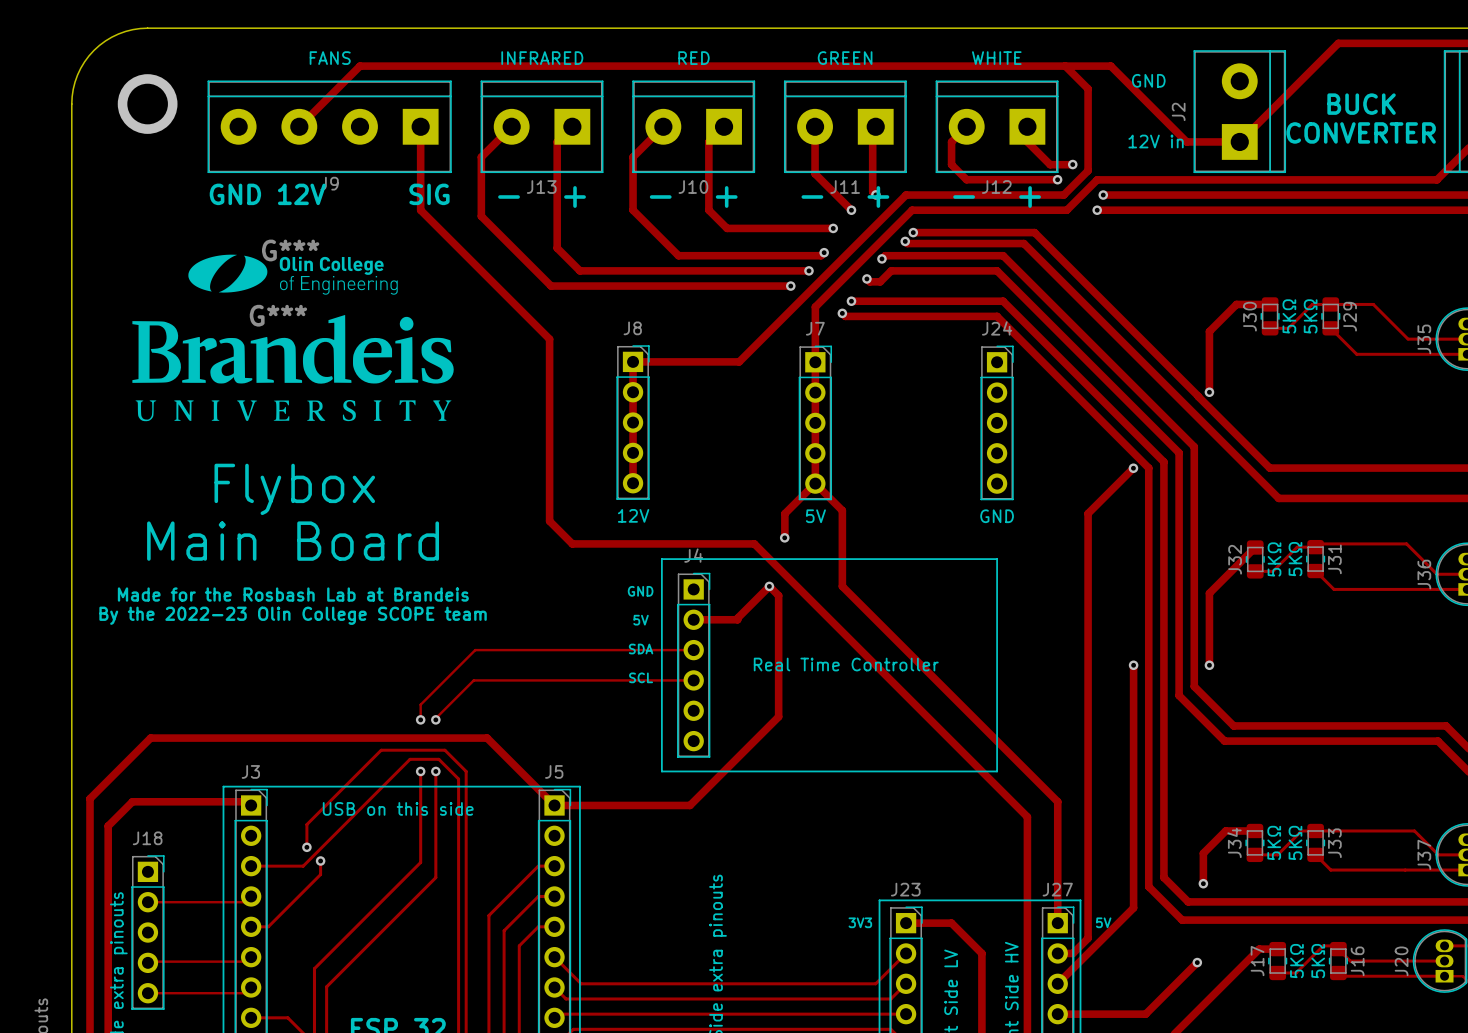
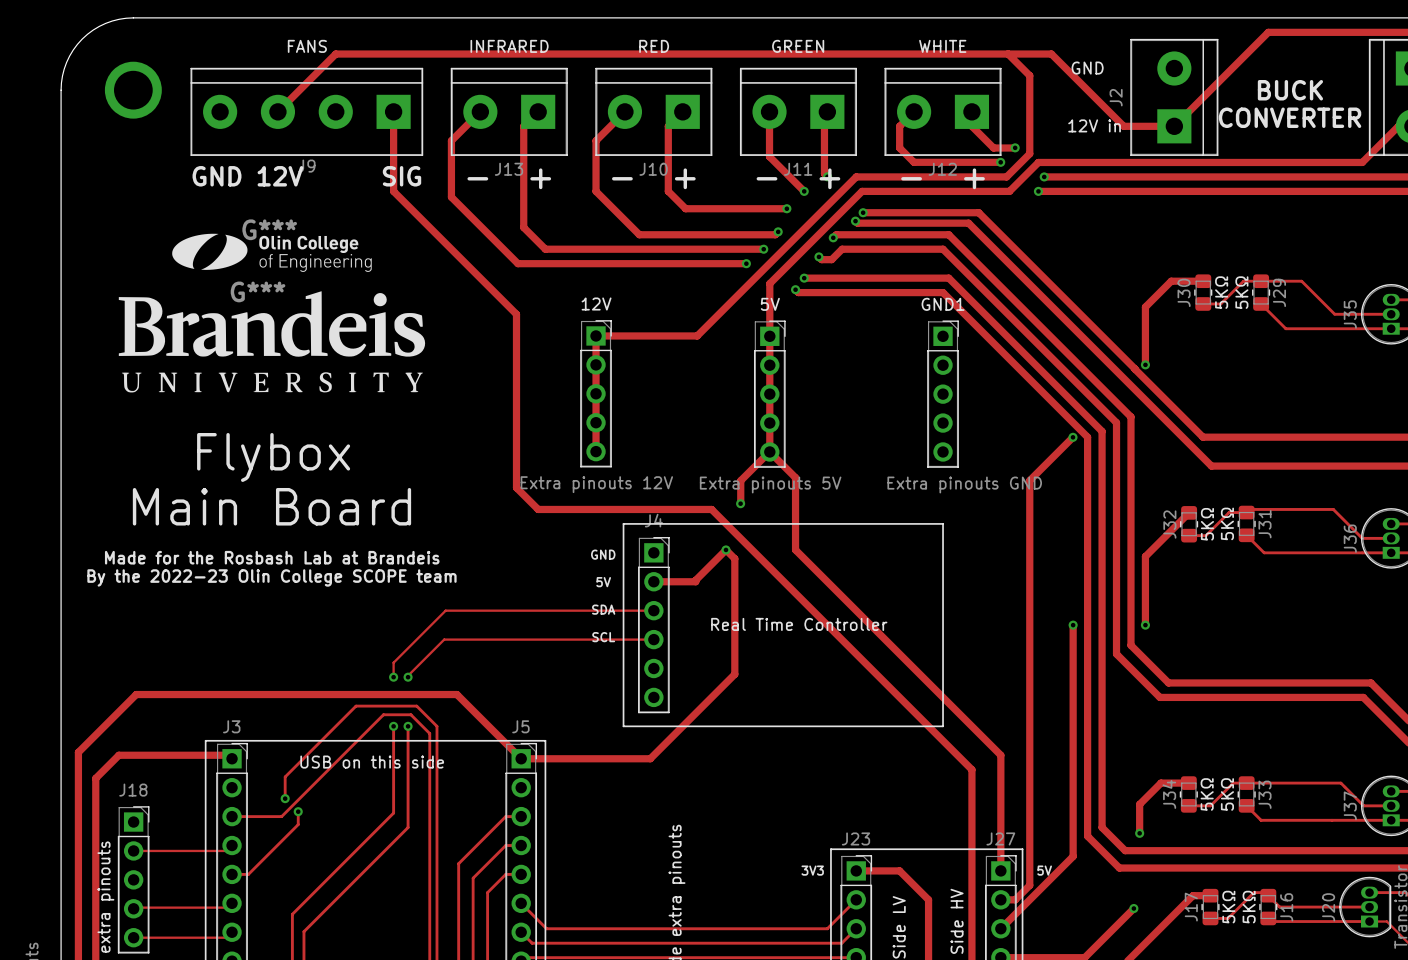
J8 name: J8 (632, 328) -> 12V (596, 304)
J7 name: J7 (815, 328) -> 5V (770, 304)
J24 name: J24 (997, 328) -> GND1 (943, 304)
J8 value: 12V (633, 515) -> Extra pinouts 12V (596, 484)
J7 value: 5V (815, 516) -> Extra pinouts 5V (770, 484)
J24 value: GND (997, 516) -> Extra pinouts GND (964, 484)

